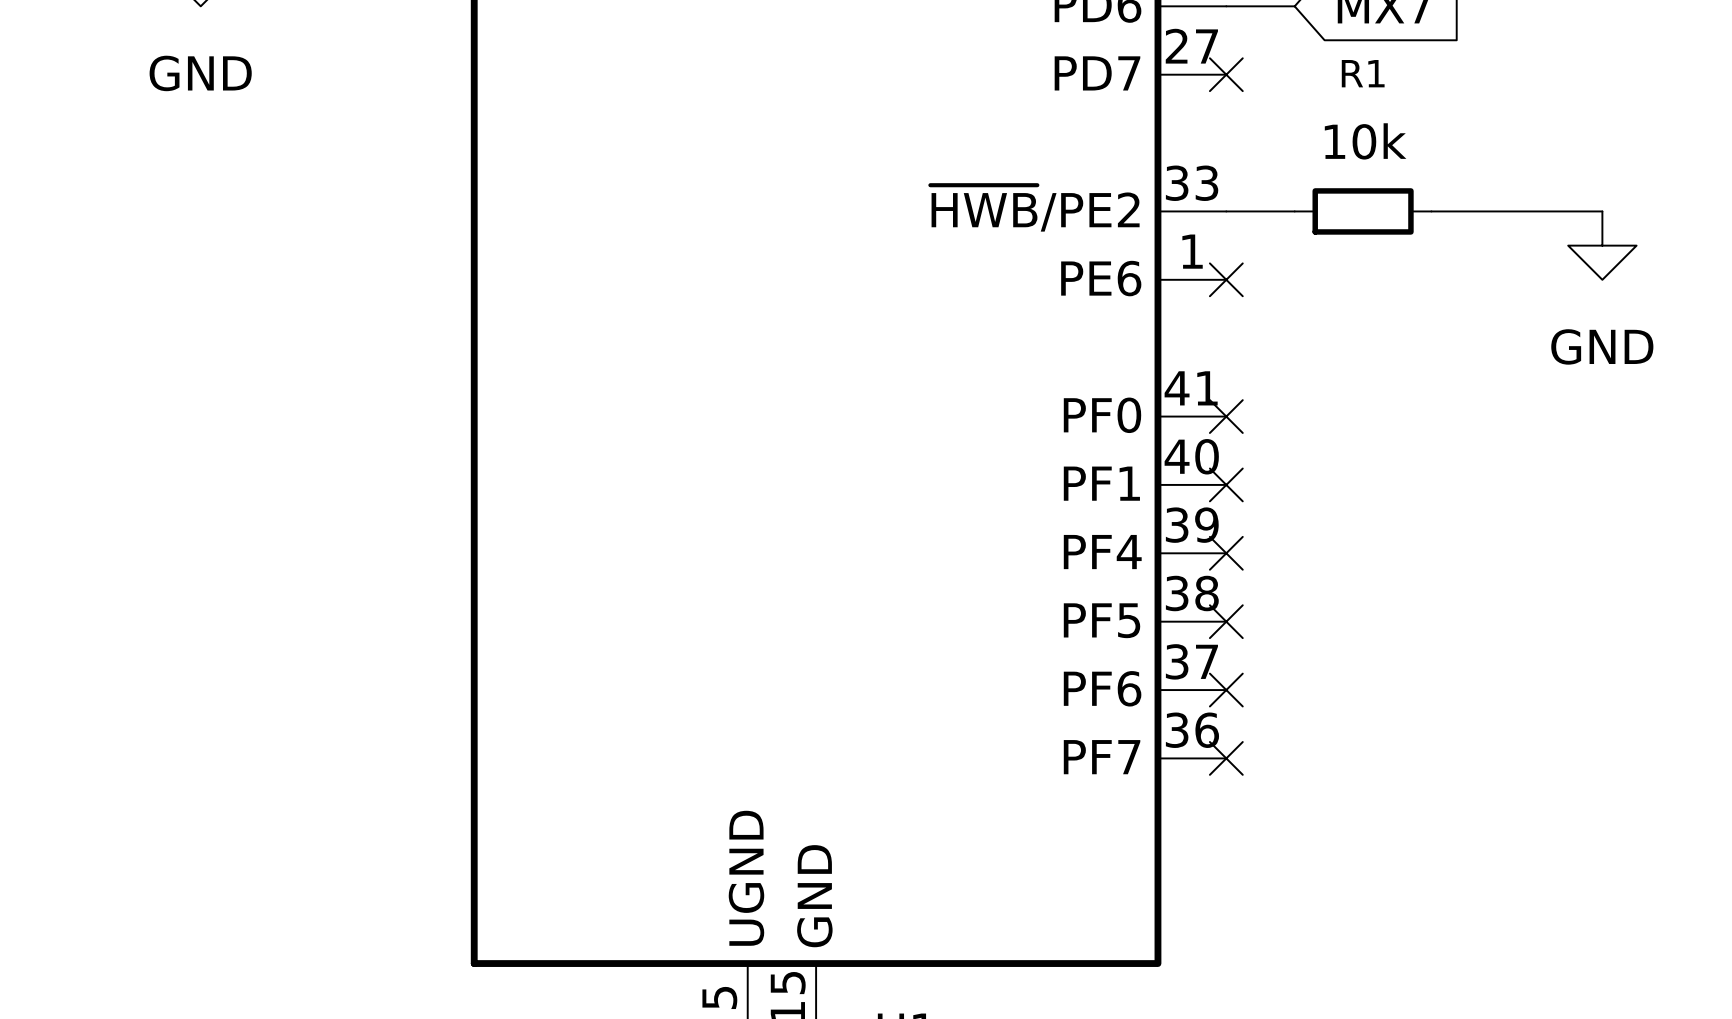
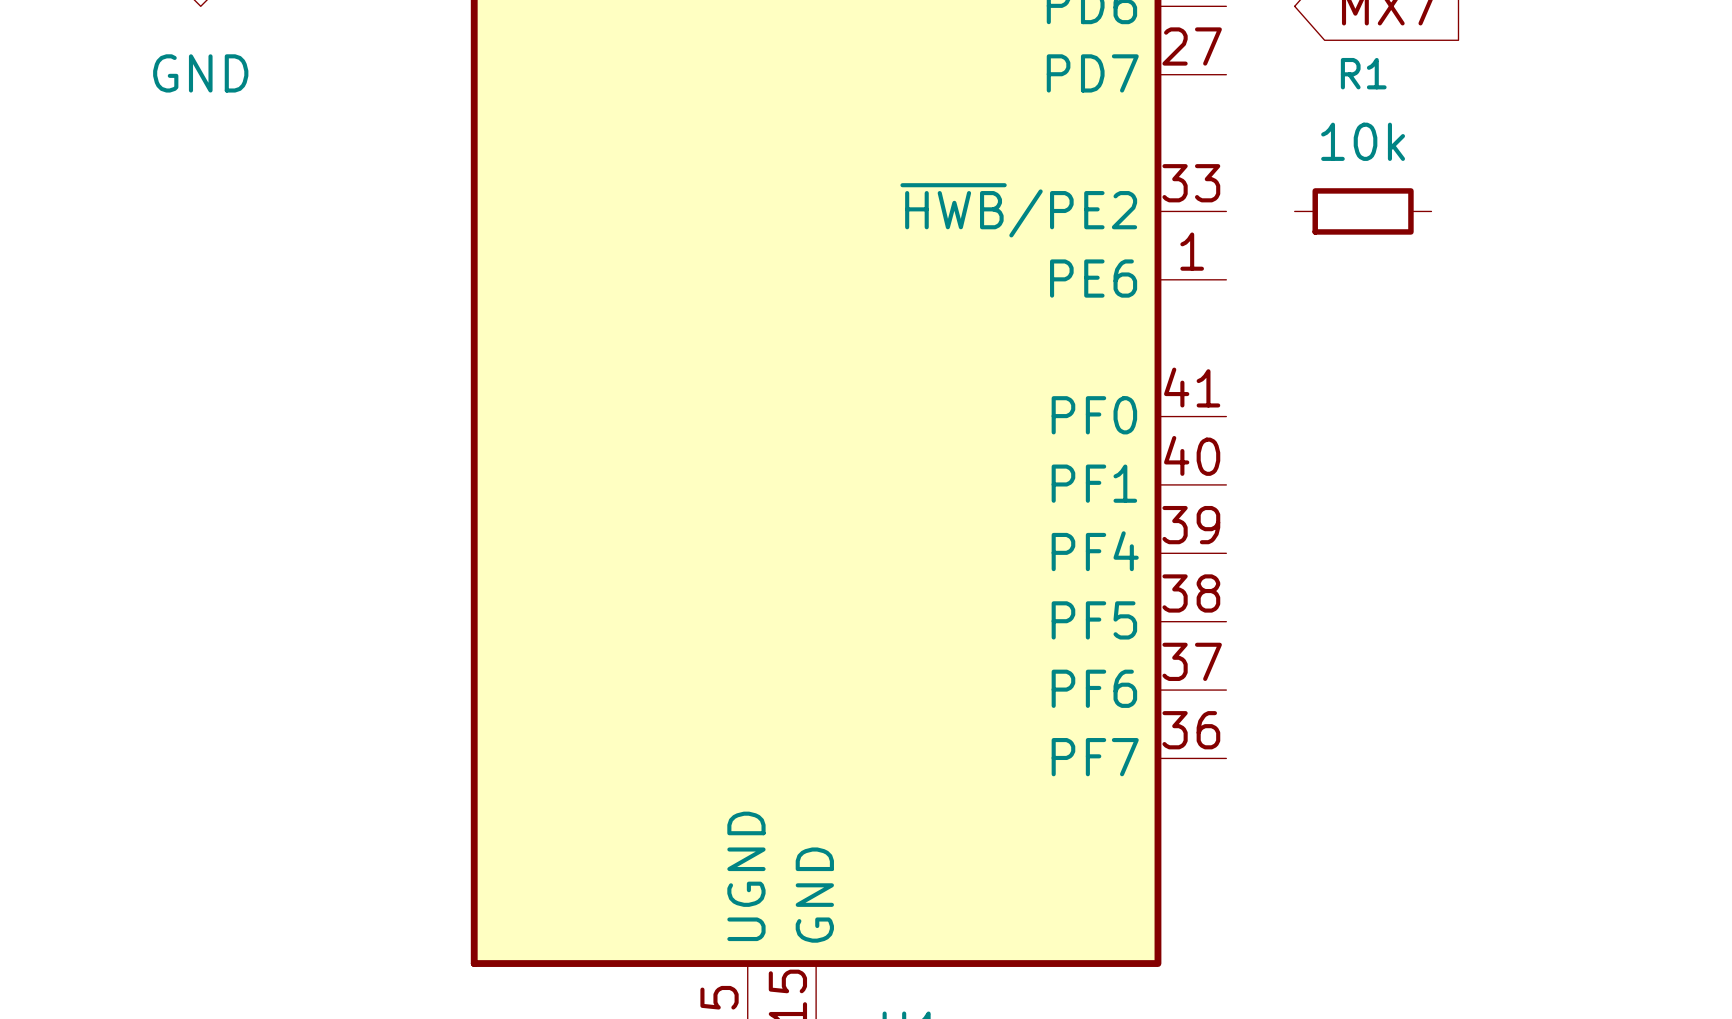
wire: (1226, 6) (1294, 6) -> none
no-connect mark: (1226, 74) -> none
wire: (1226, 211) (1294, 211) -> none
wire: (1431, 211) (1602, 211) -> none
power symbol: GND (1602, 245) -> none
no-connect mark: (1226, 279) -> none
no-connect mark: (1226, 416) -> none
no-connect mark: (1226, 484) -> none
no-connect mark: (1226, 553) -> none
no-connect mark: (1226, 621) -> none
no-connect mark: (1226, 690) -> none
no-connect mark: (1226, 758) -> none

